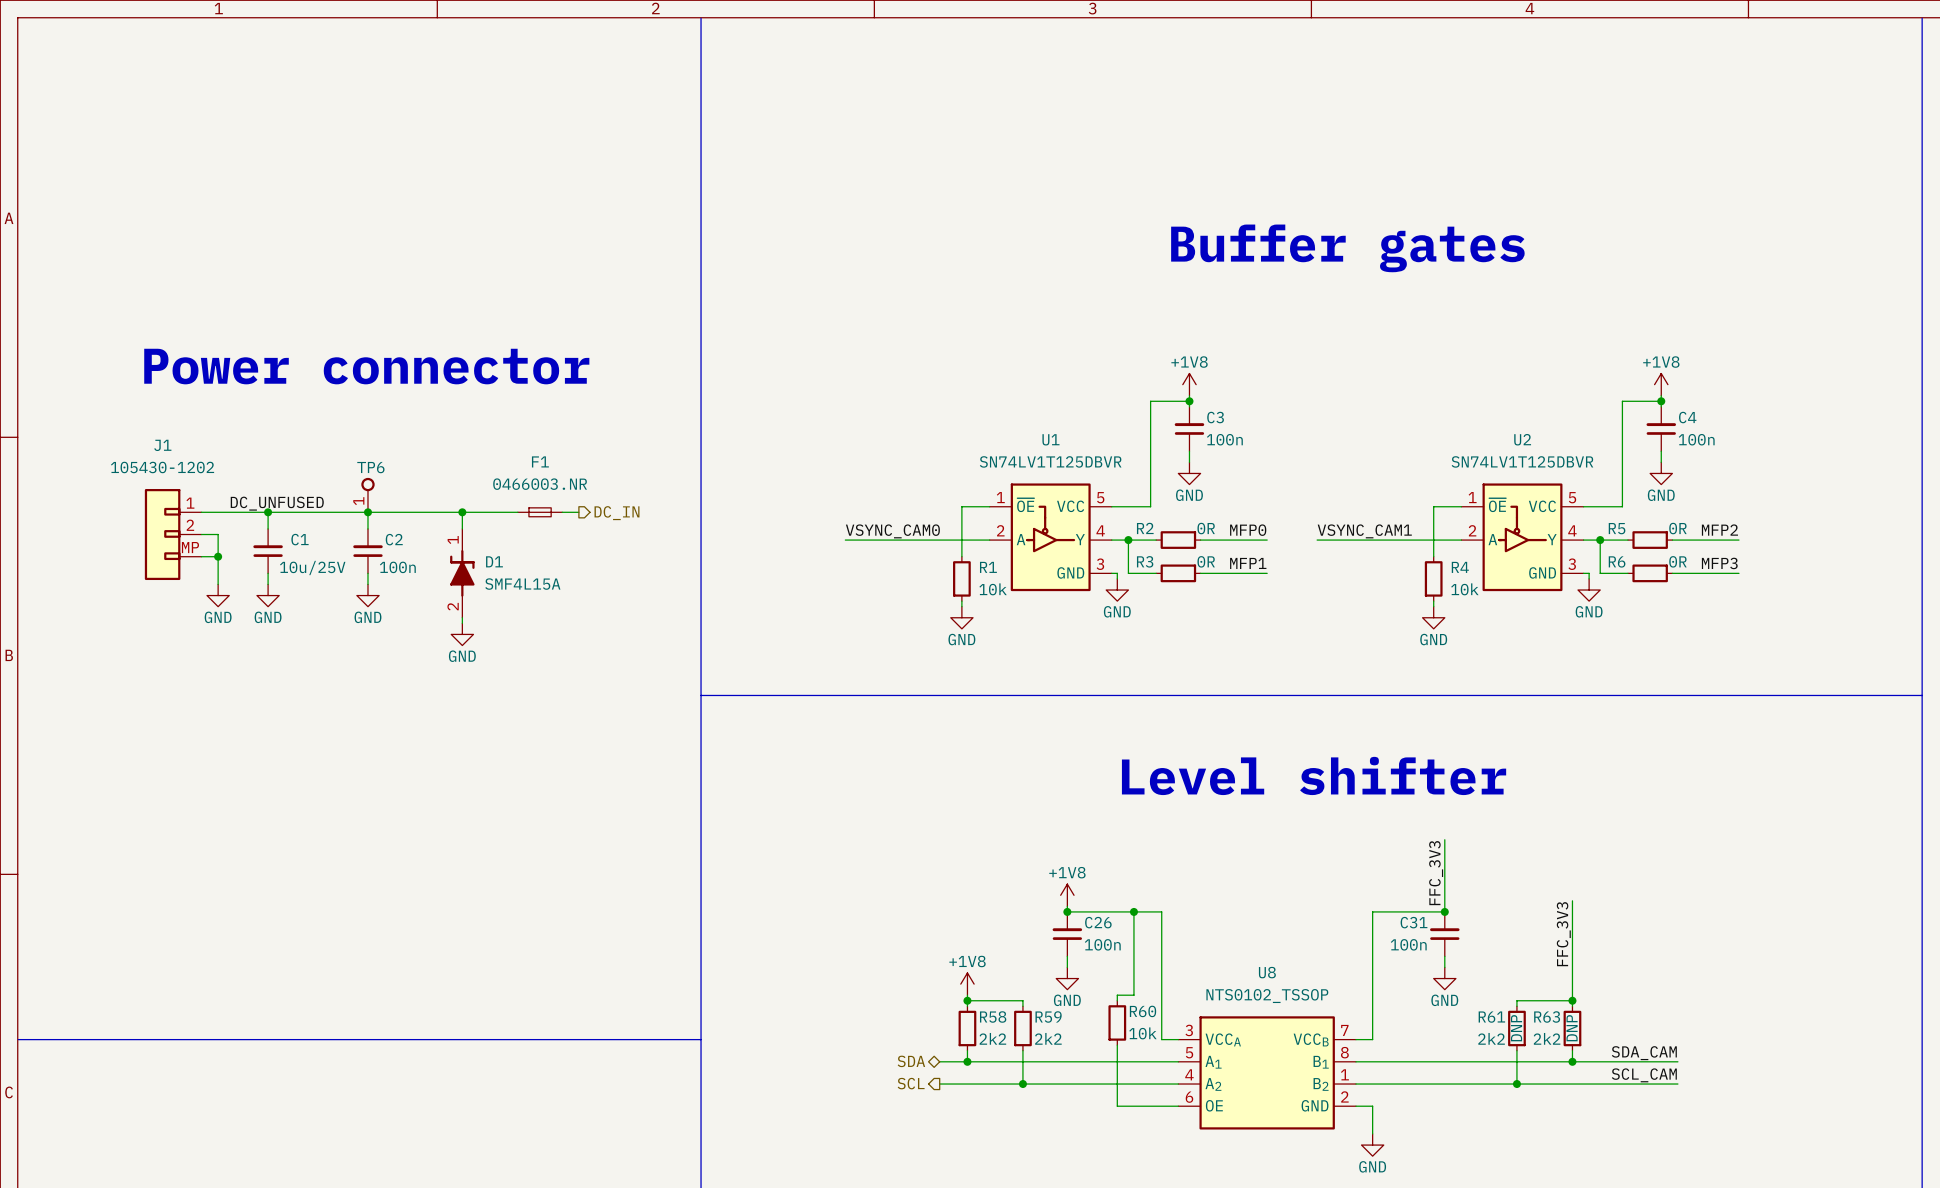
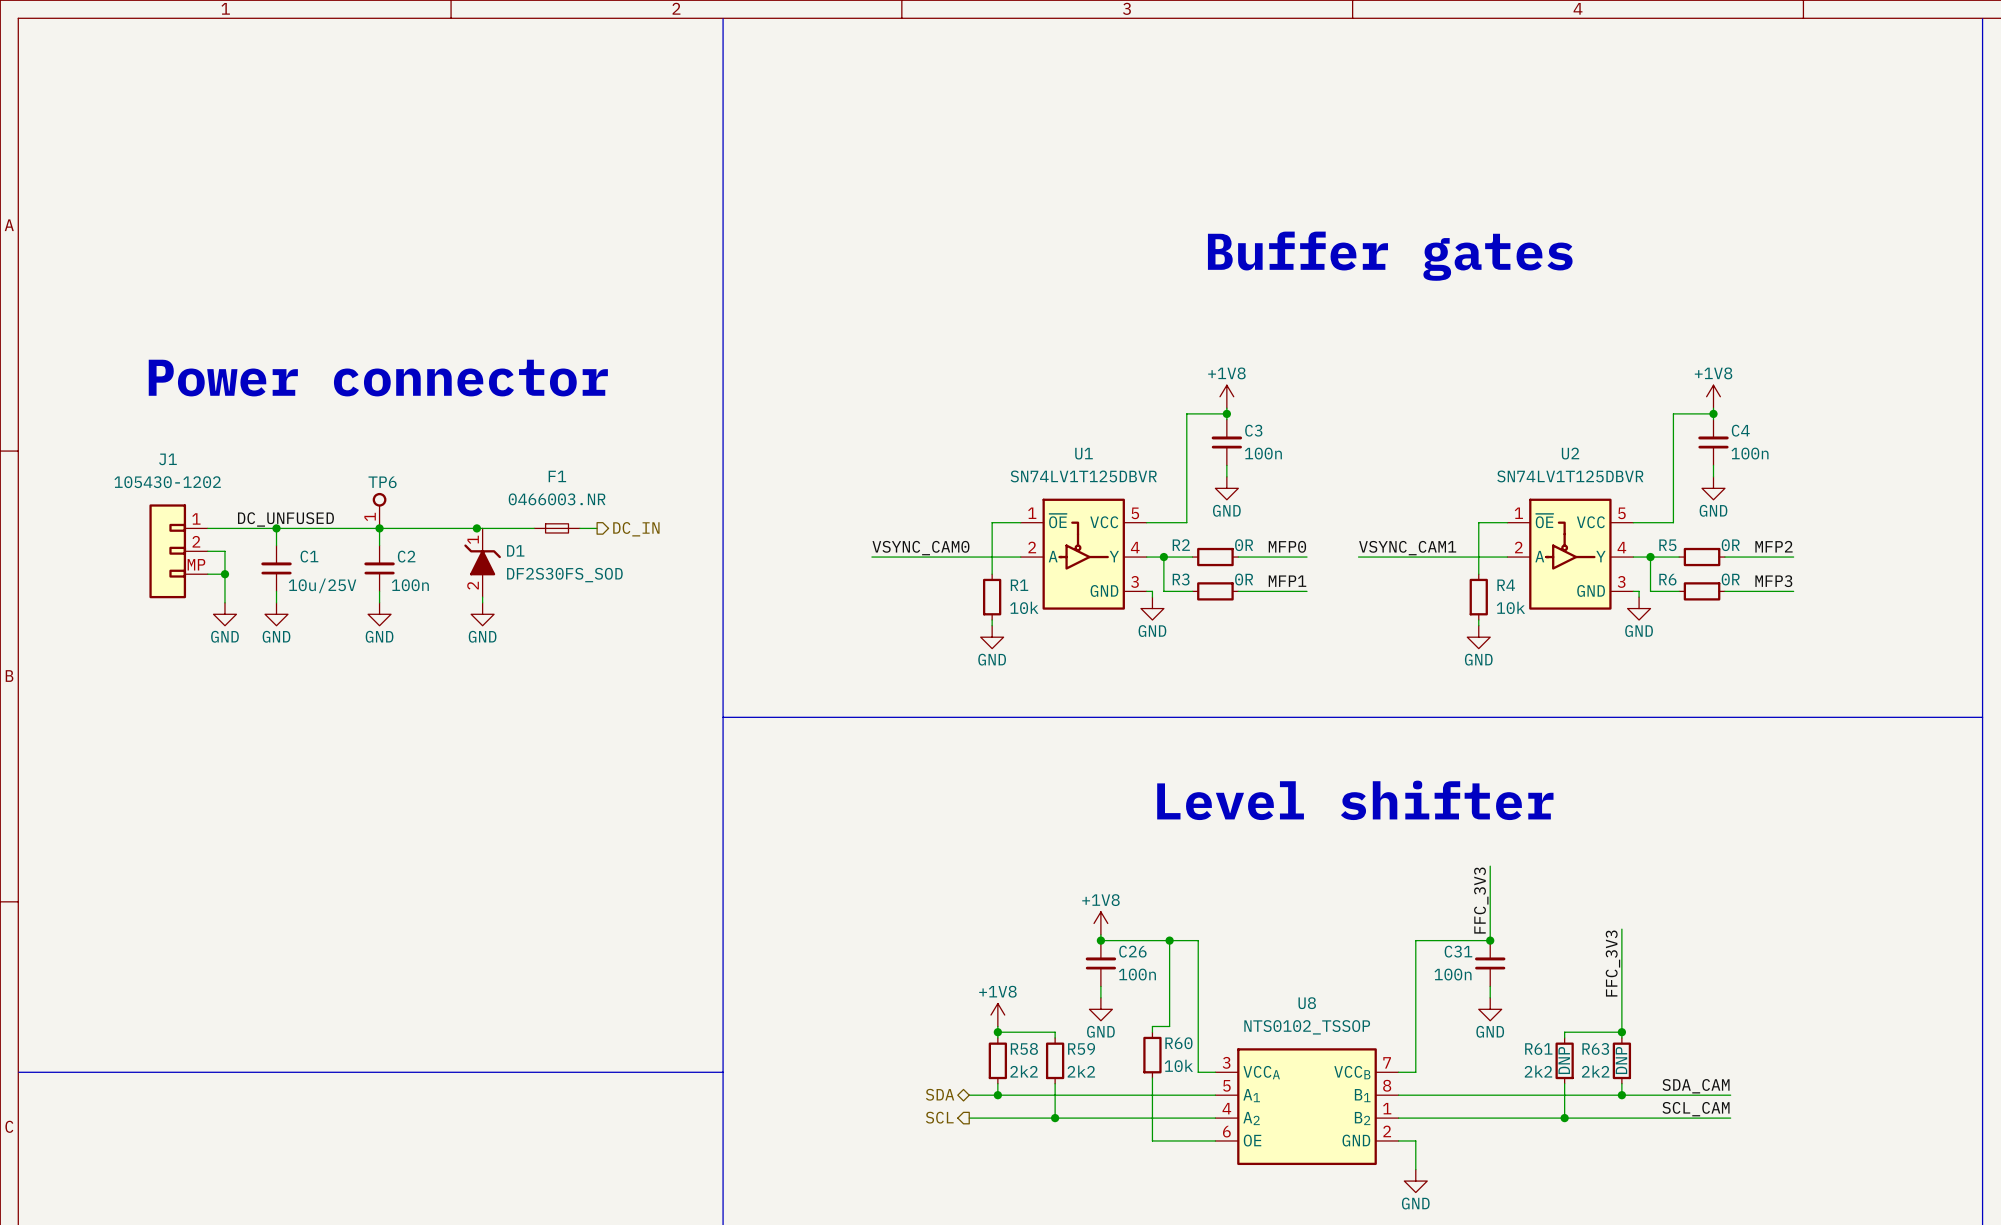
wire: (462, 512) (462, 528) -> none
D1 symbol: [450, 528, 475, 618] -> [464, 528, 501, 598]
D1 value: SMF4L15A (522, 584) -> DF2S30FS_SOD (564, 575)
power symbol position: GND (462, 634) -> GND (482, 614)

